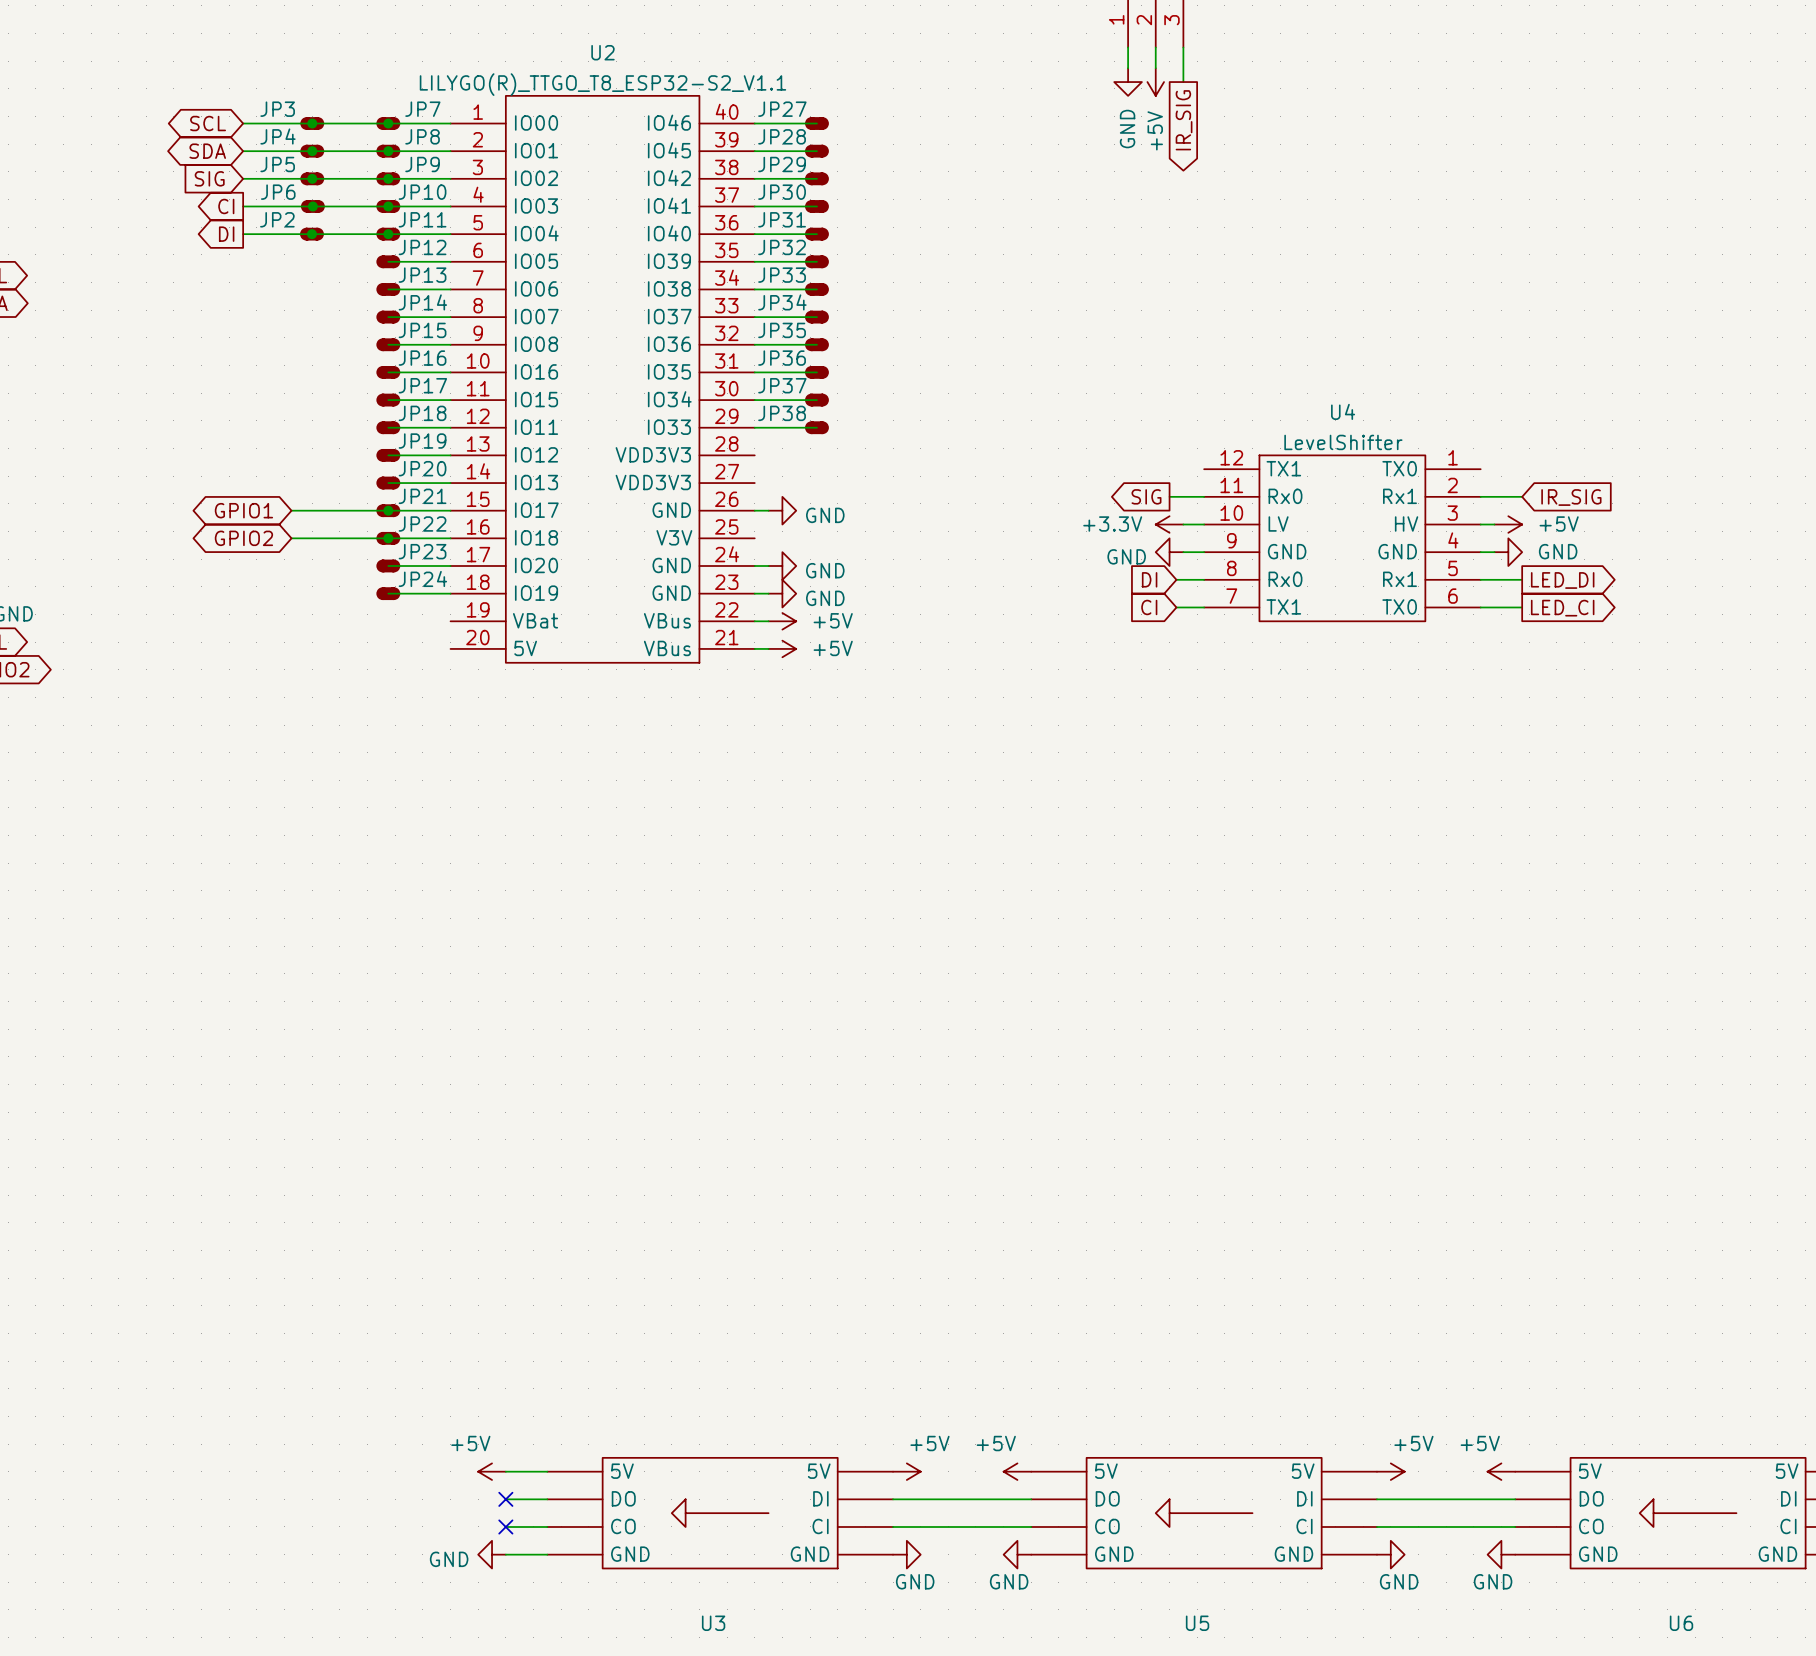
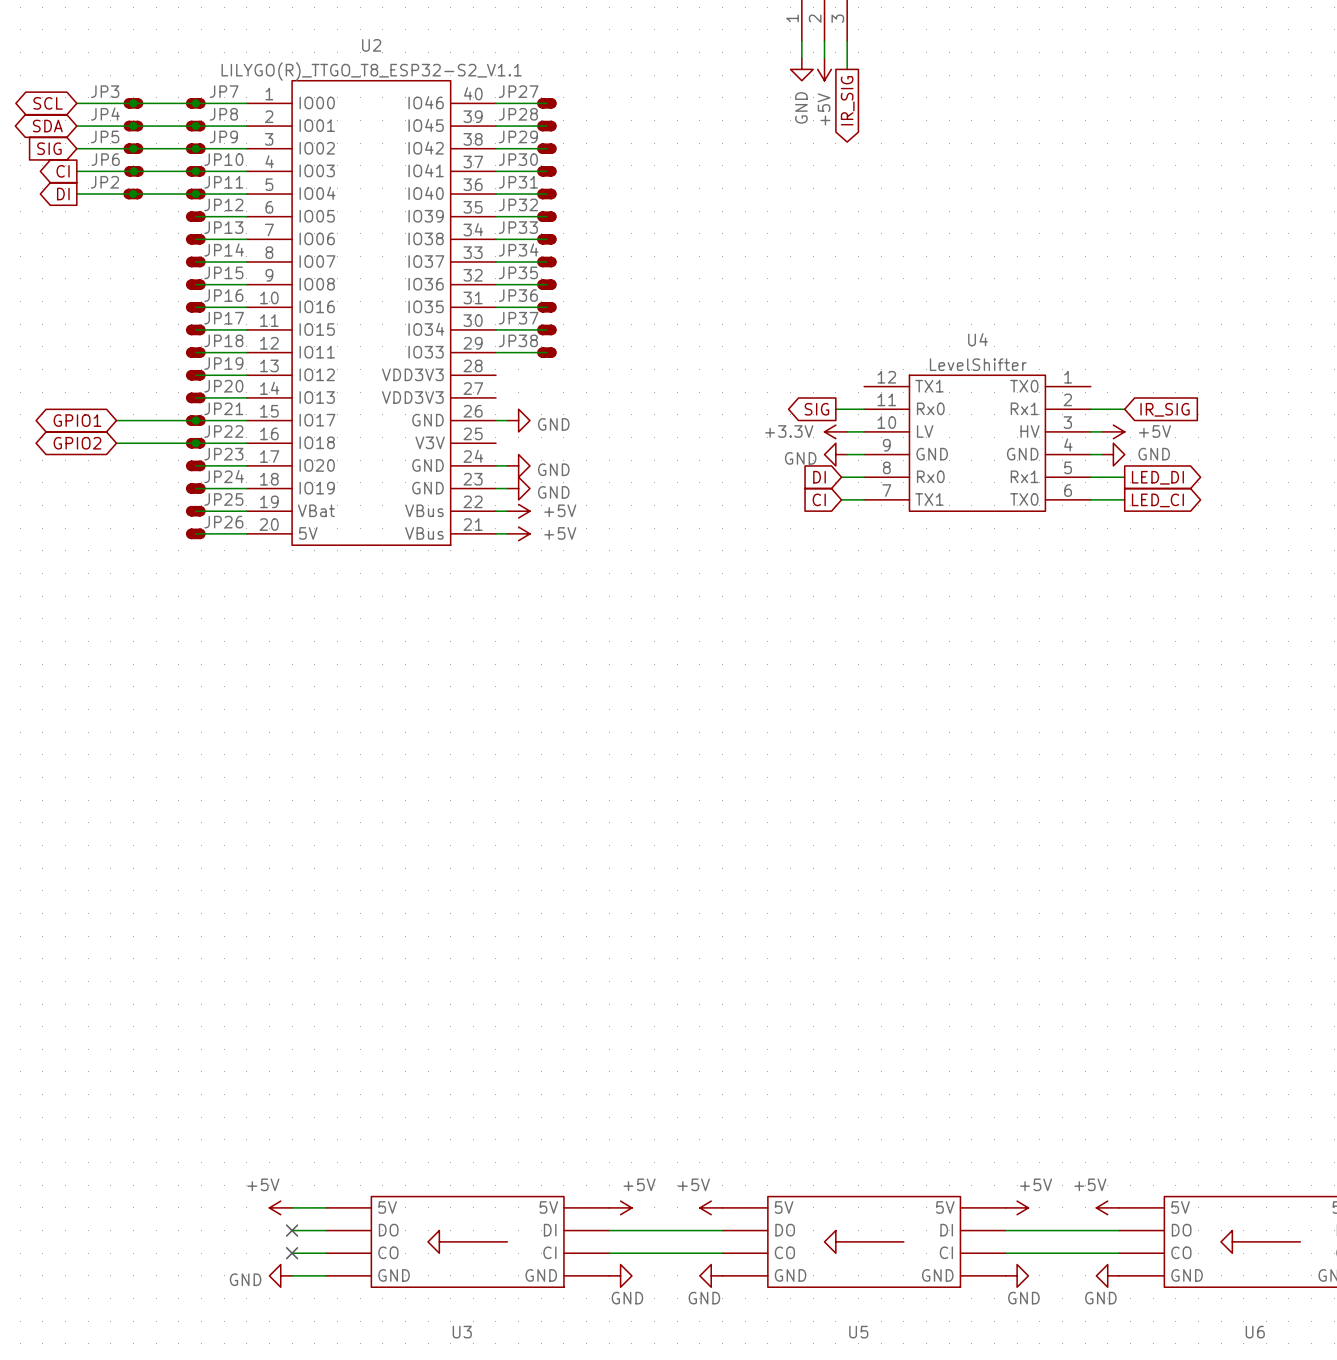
wire: none -> (195, 511) (246, 511)
JP25: none -> (195, 511)
wire: none -> (195, 533) (246, 533)
JP26: none -> (195, 533)

